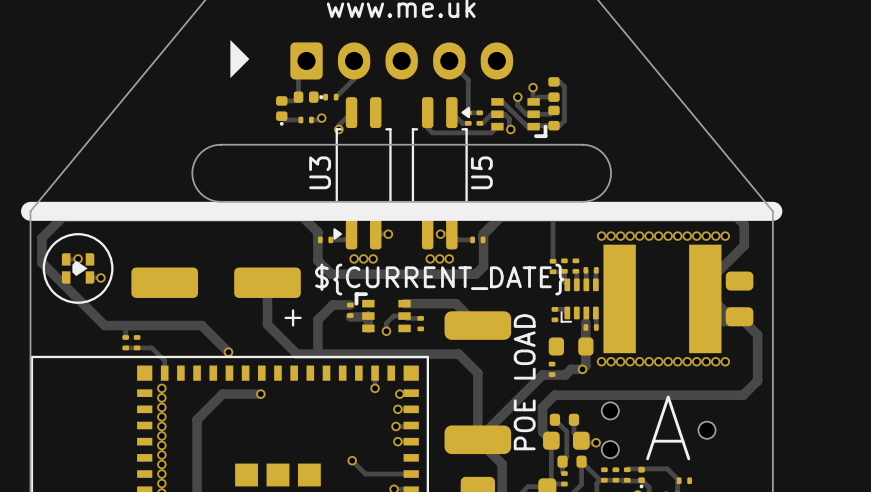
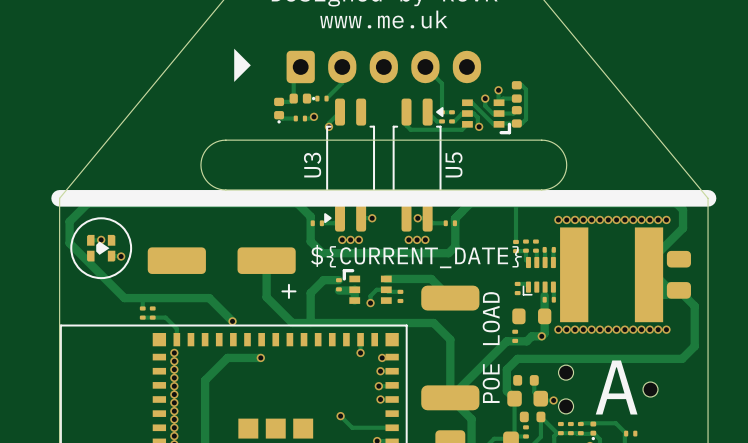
track: (554, 419) (566, 431) (566, 457) (562, 461) (562, 471) (564, 473) -> none

